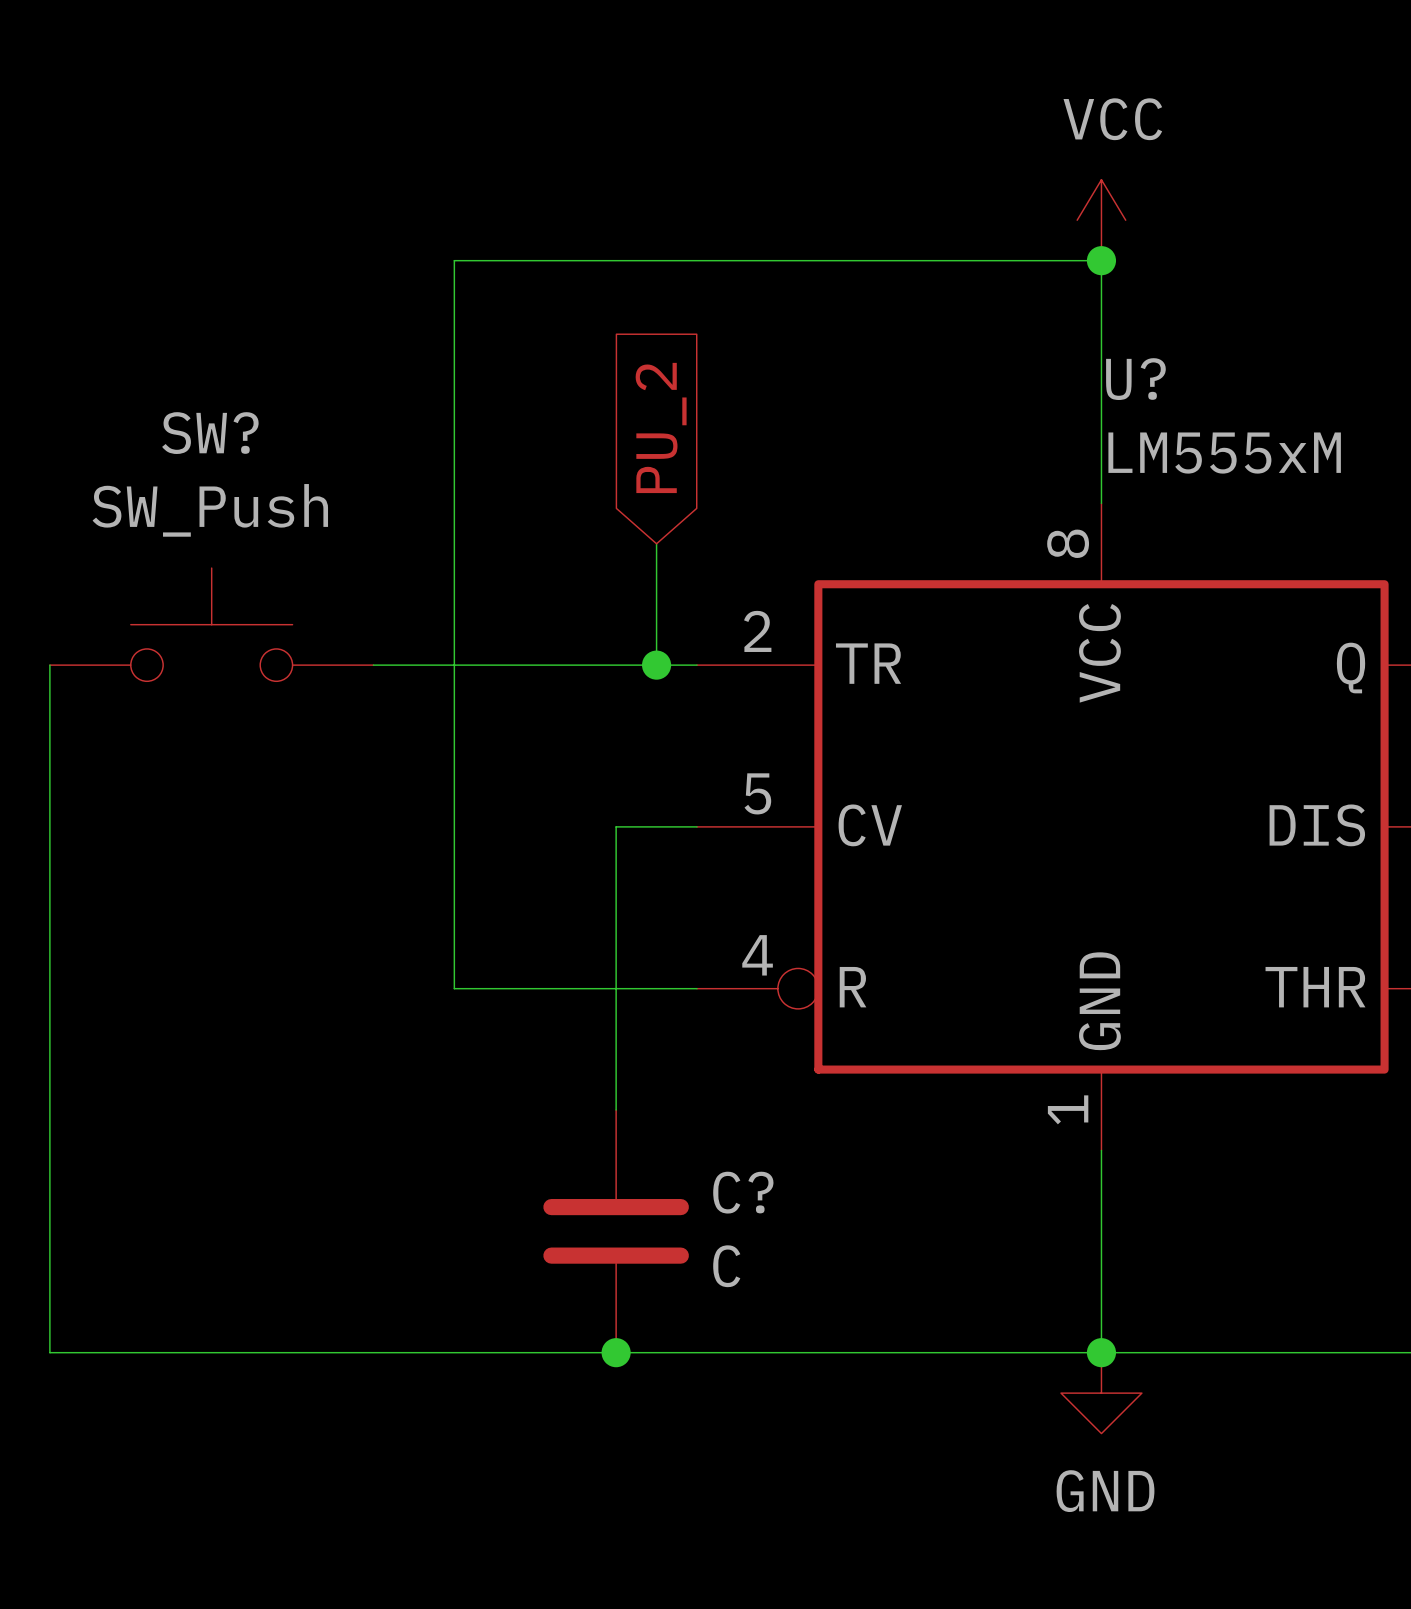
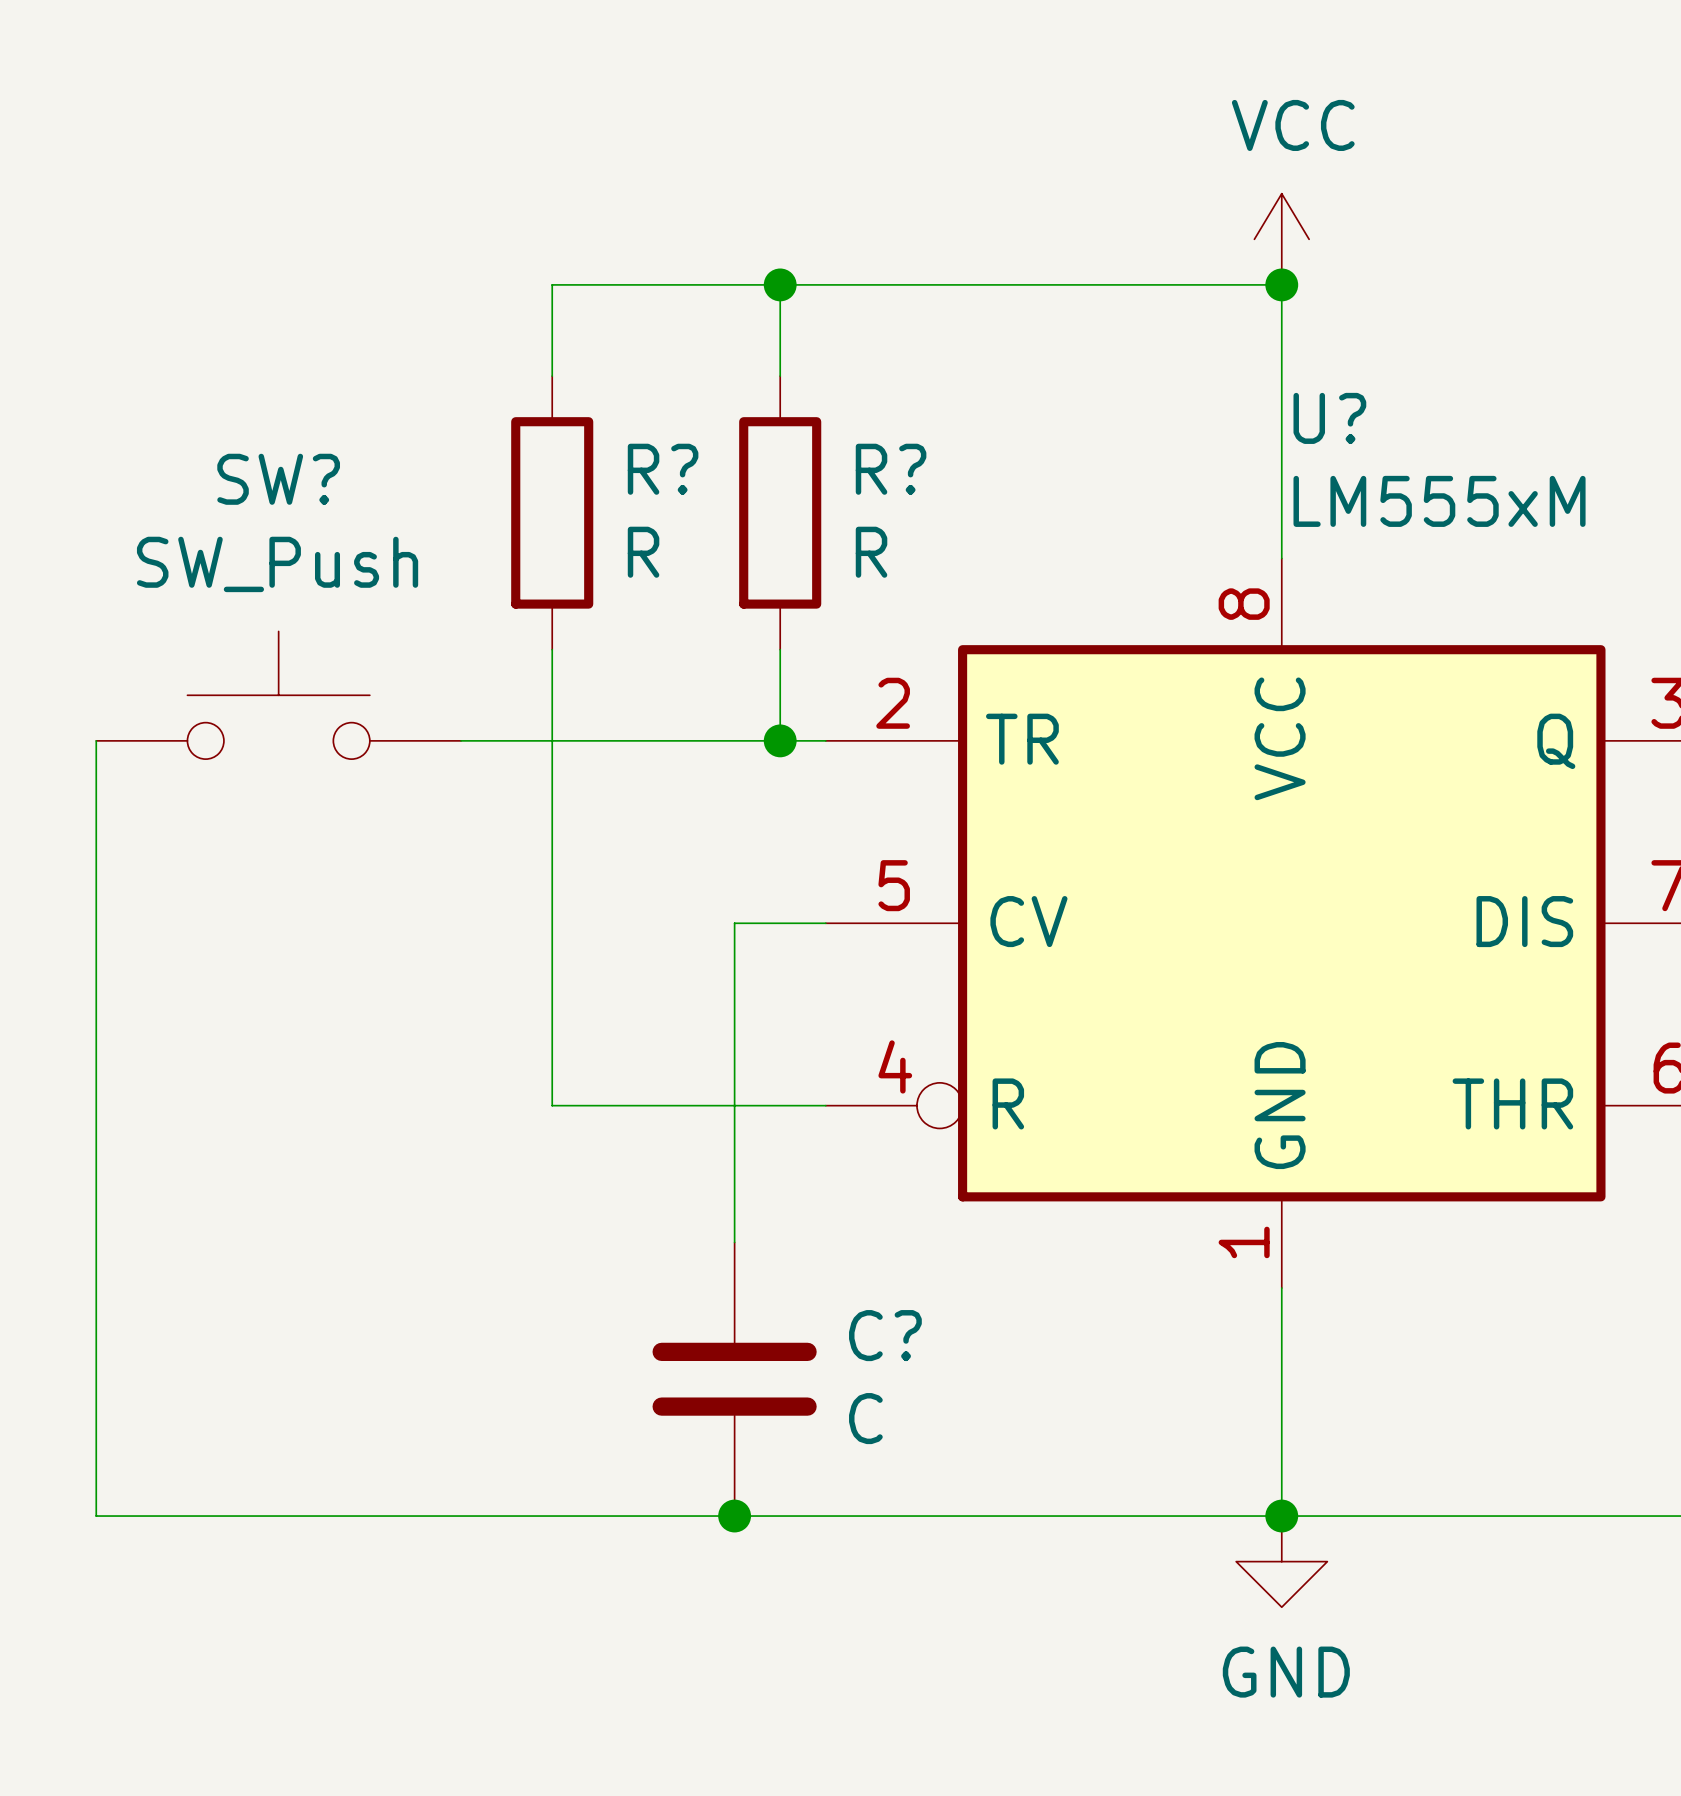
wire: none -> (780, 284) (780, 376)
junction: none -> (780, 284)
wire: (454, 341) (454, 584) -> none
global label: PU_2 (661, 427) -> none
R?: none -> R (552, 512)
R?: none -> R (780, 512)

